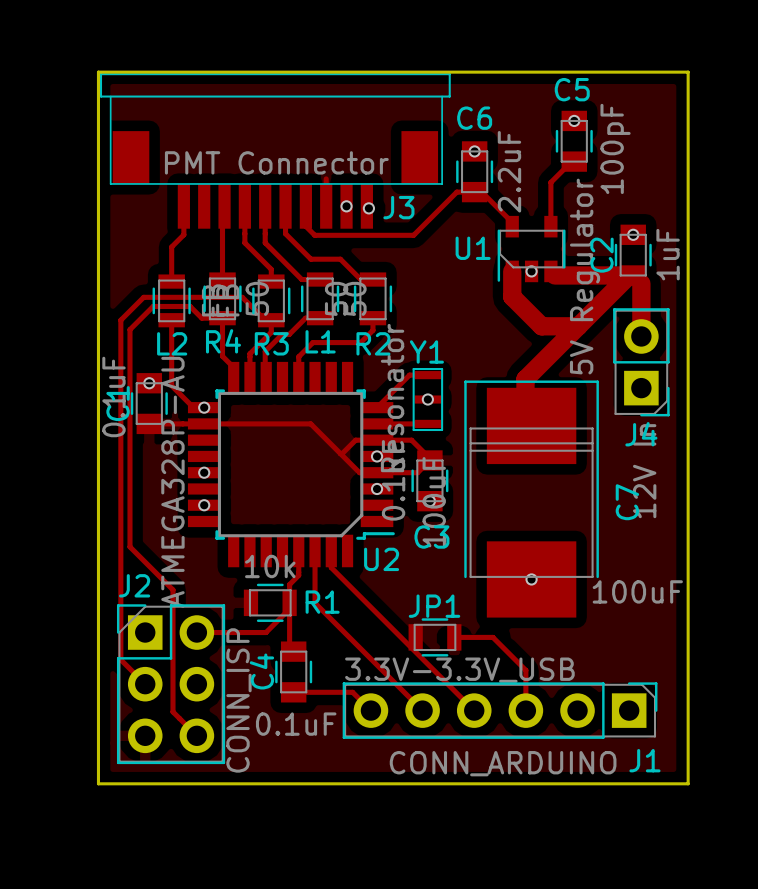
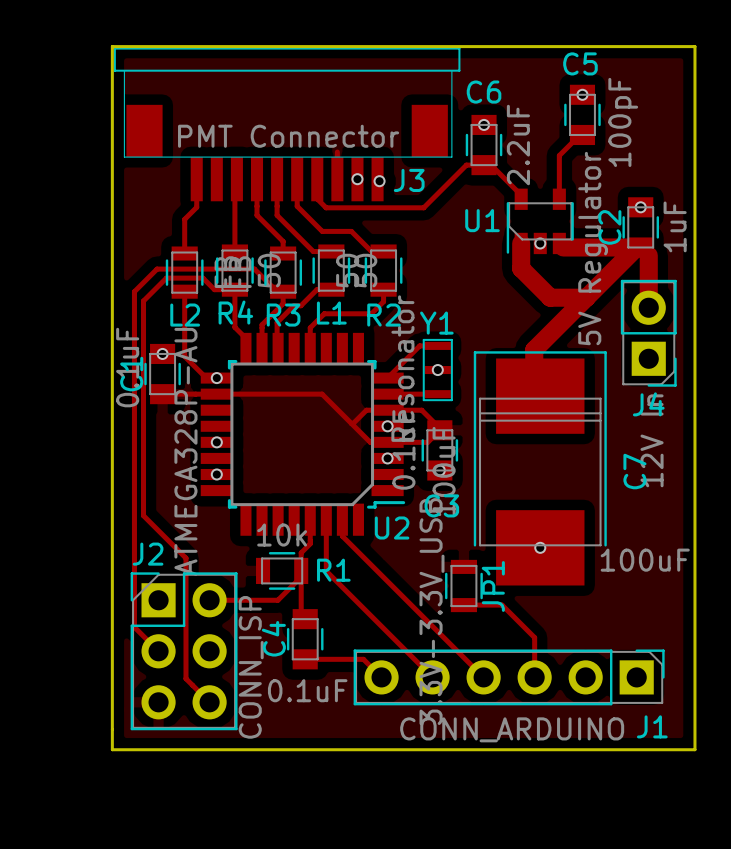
JP1 rotation: 0° (434, 637) -> 90° clockwise (463, 586)

